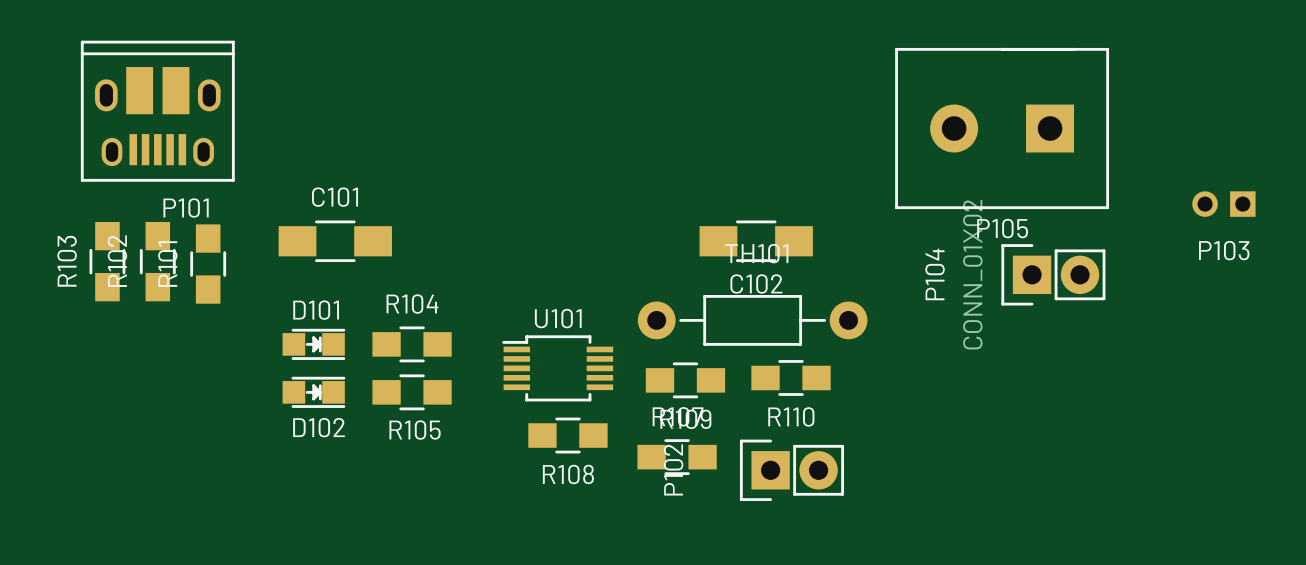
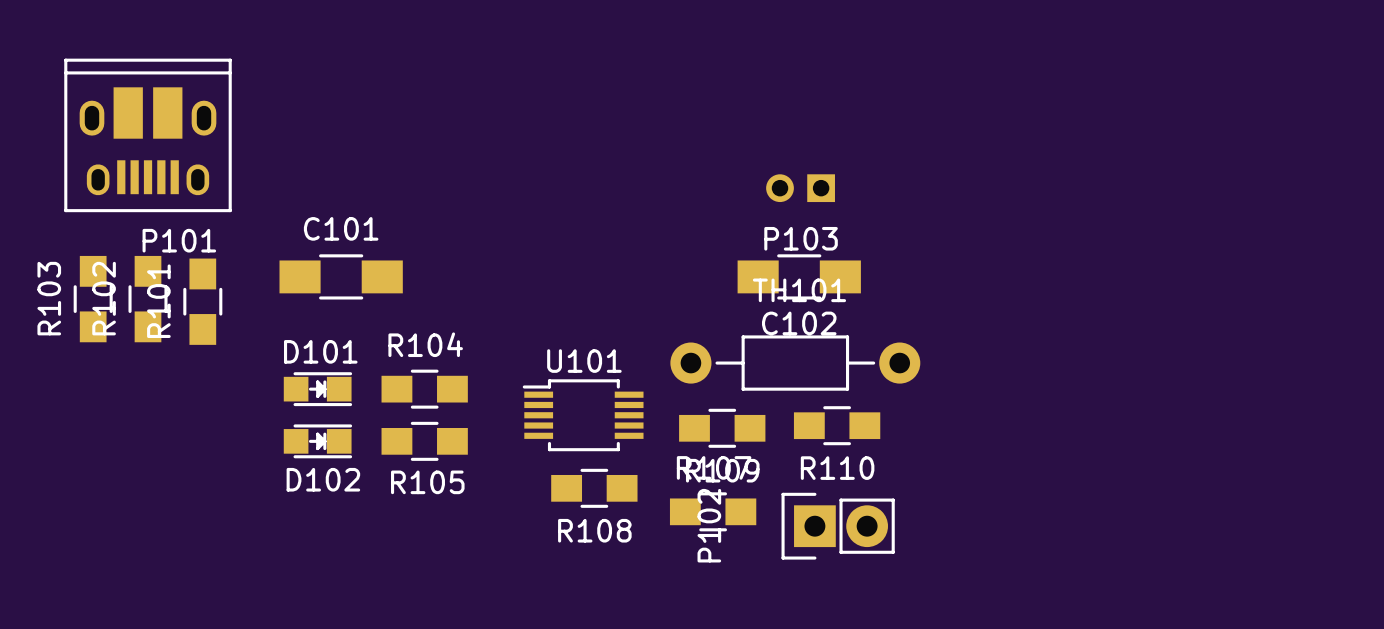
P105: (1002, 128) -> none
P103 position: (1223, 204) -> (800, 188)
P104: CONN_01X02 (1053, 274) -> none

